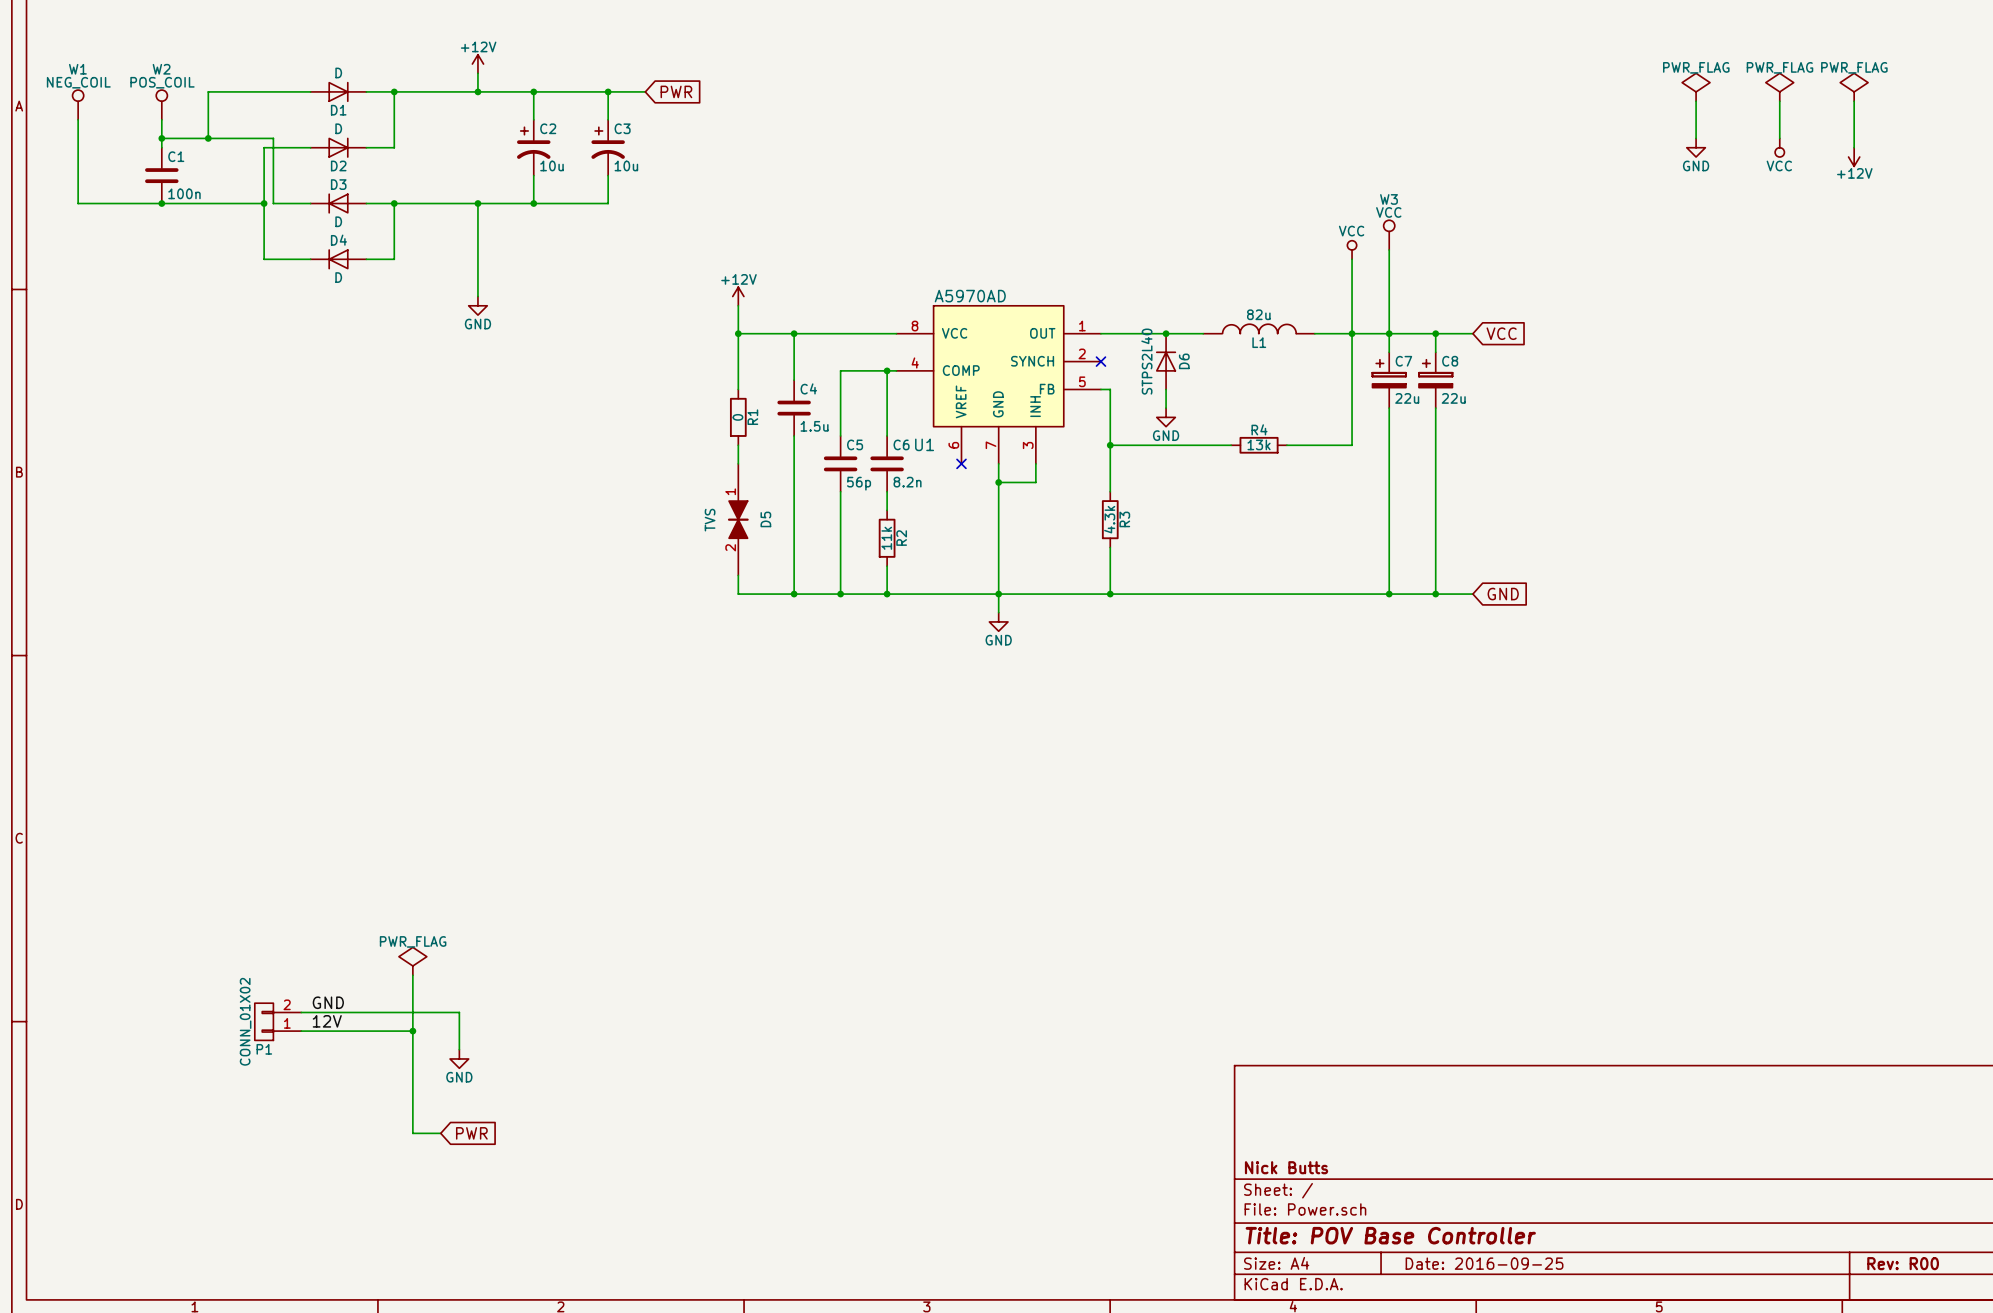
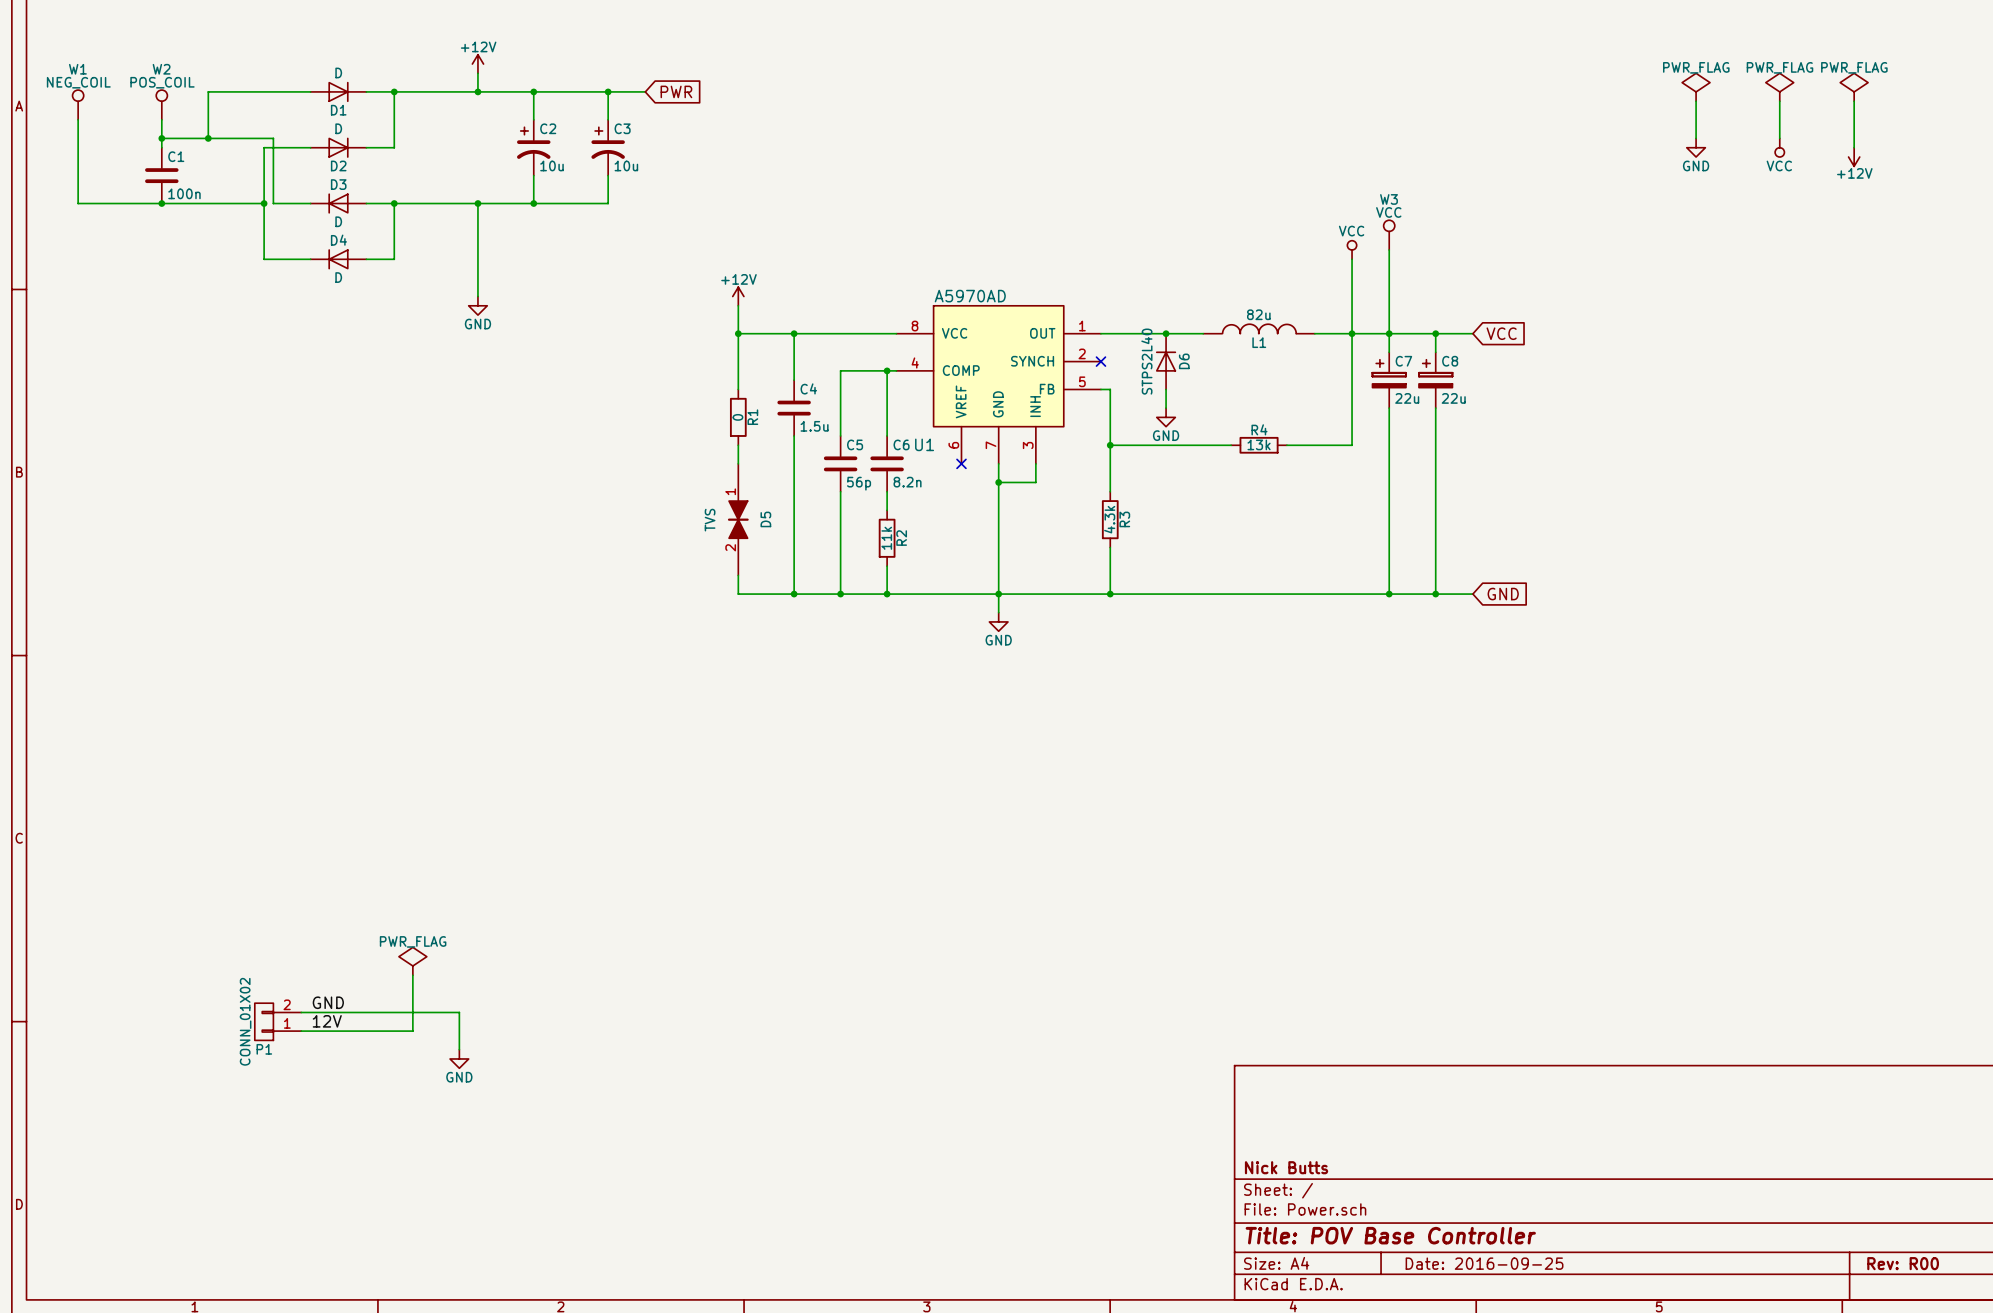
wire: (412, 1031) (412, 1133) (440, 1133) -> none
junction: (412, 1031) -> none
global label: PWR (471, 1133) -> none

